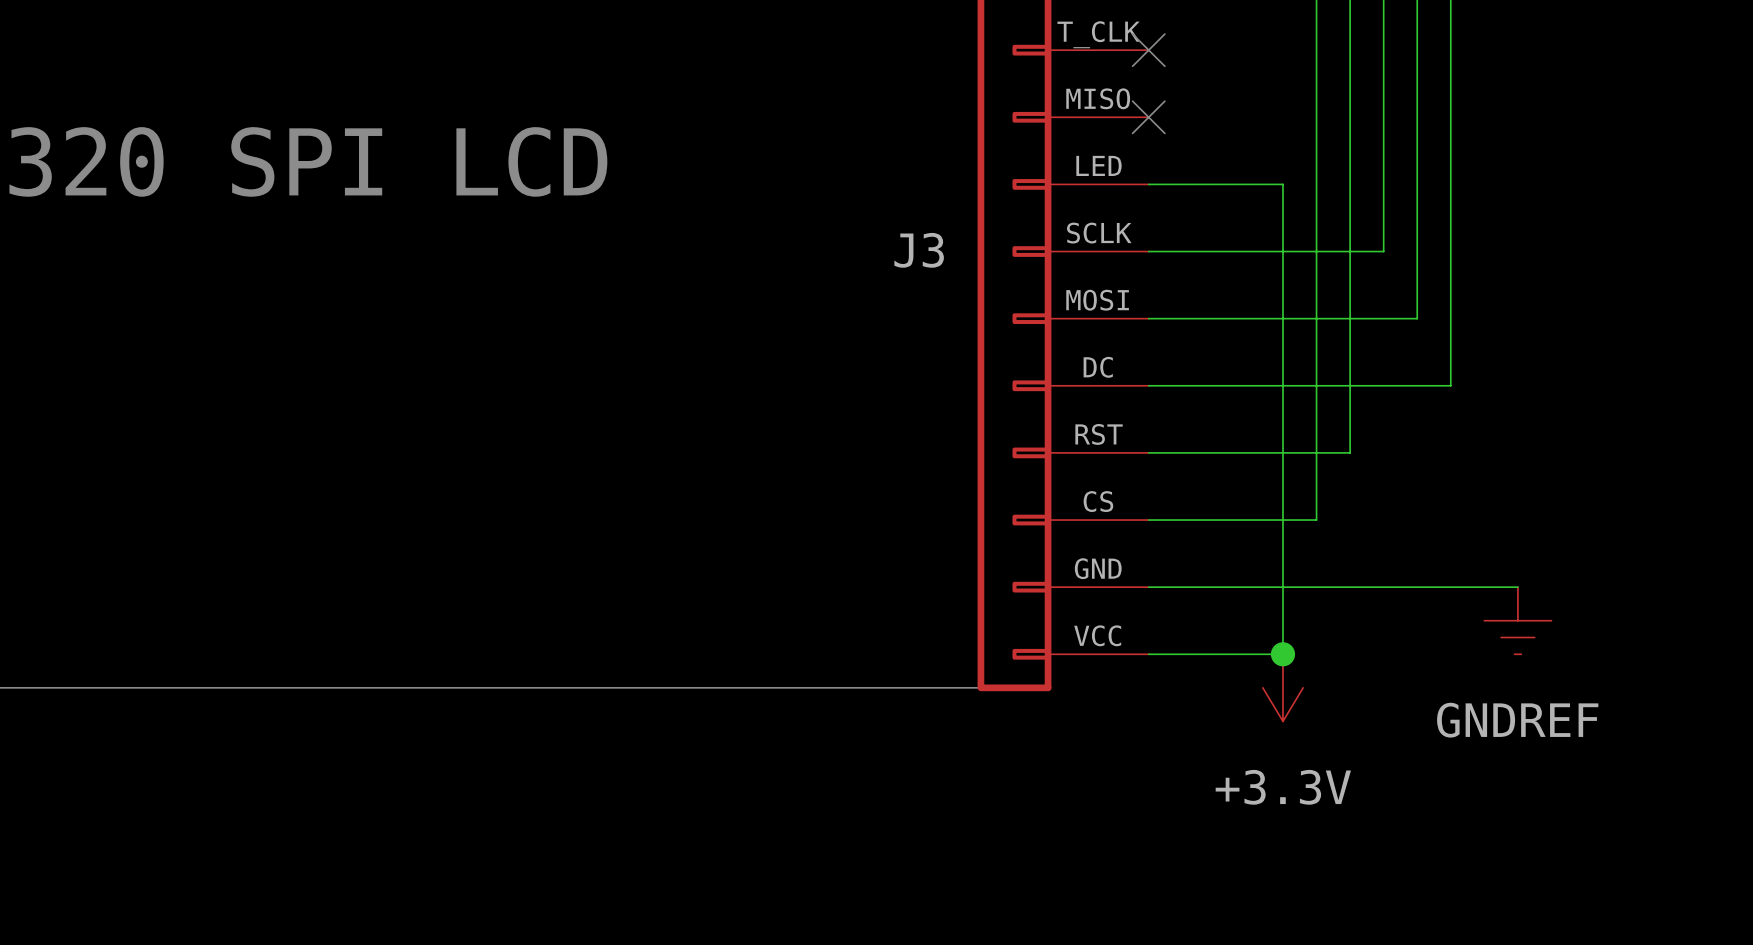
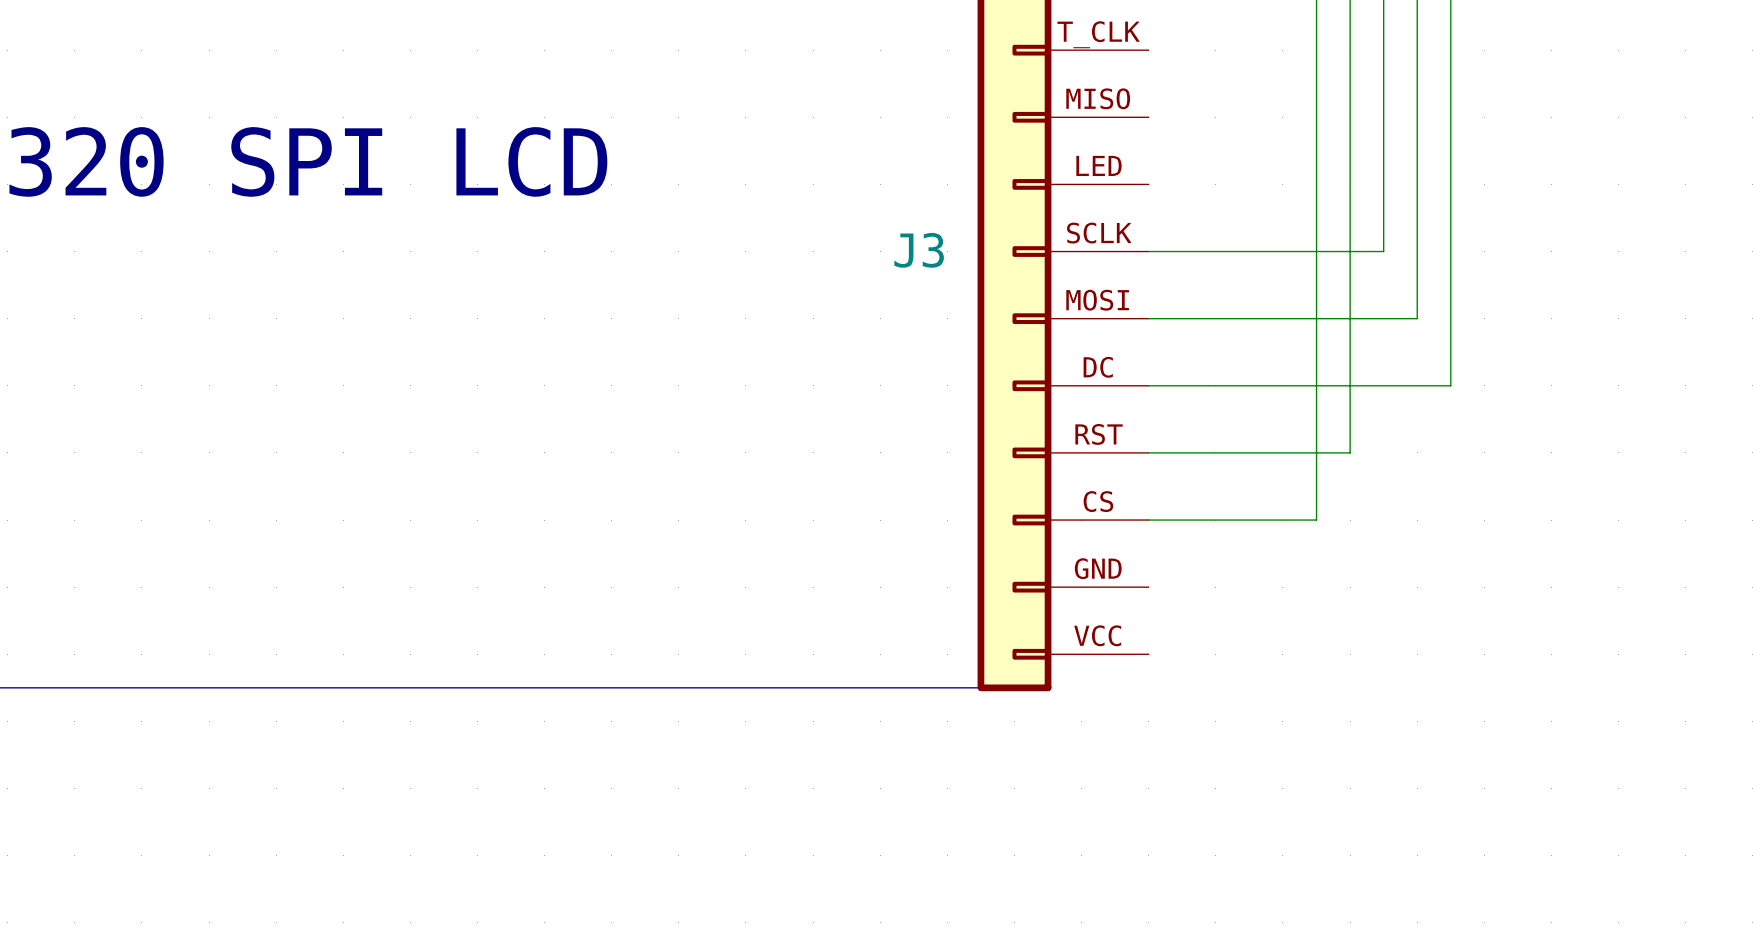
no-connect mark: (1148, 50) -> none
no-connect mark: (1148, 117) -> none
wire: (1148, 184) (1282, 184) (1282, 654) (1148, 654) -> none
wire: (1148, 587) (1517, 587) -> none
power symbol: GNDREF (1517, 620) -> none
junction: (1282, 654) -> none
power symbol: +3.3V (1282, 687) -> none

